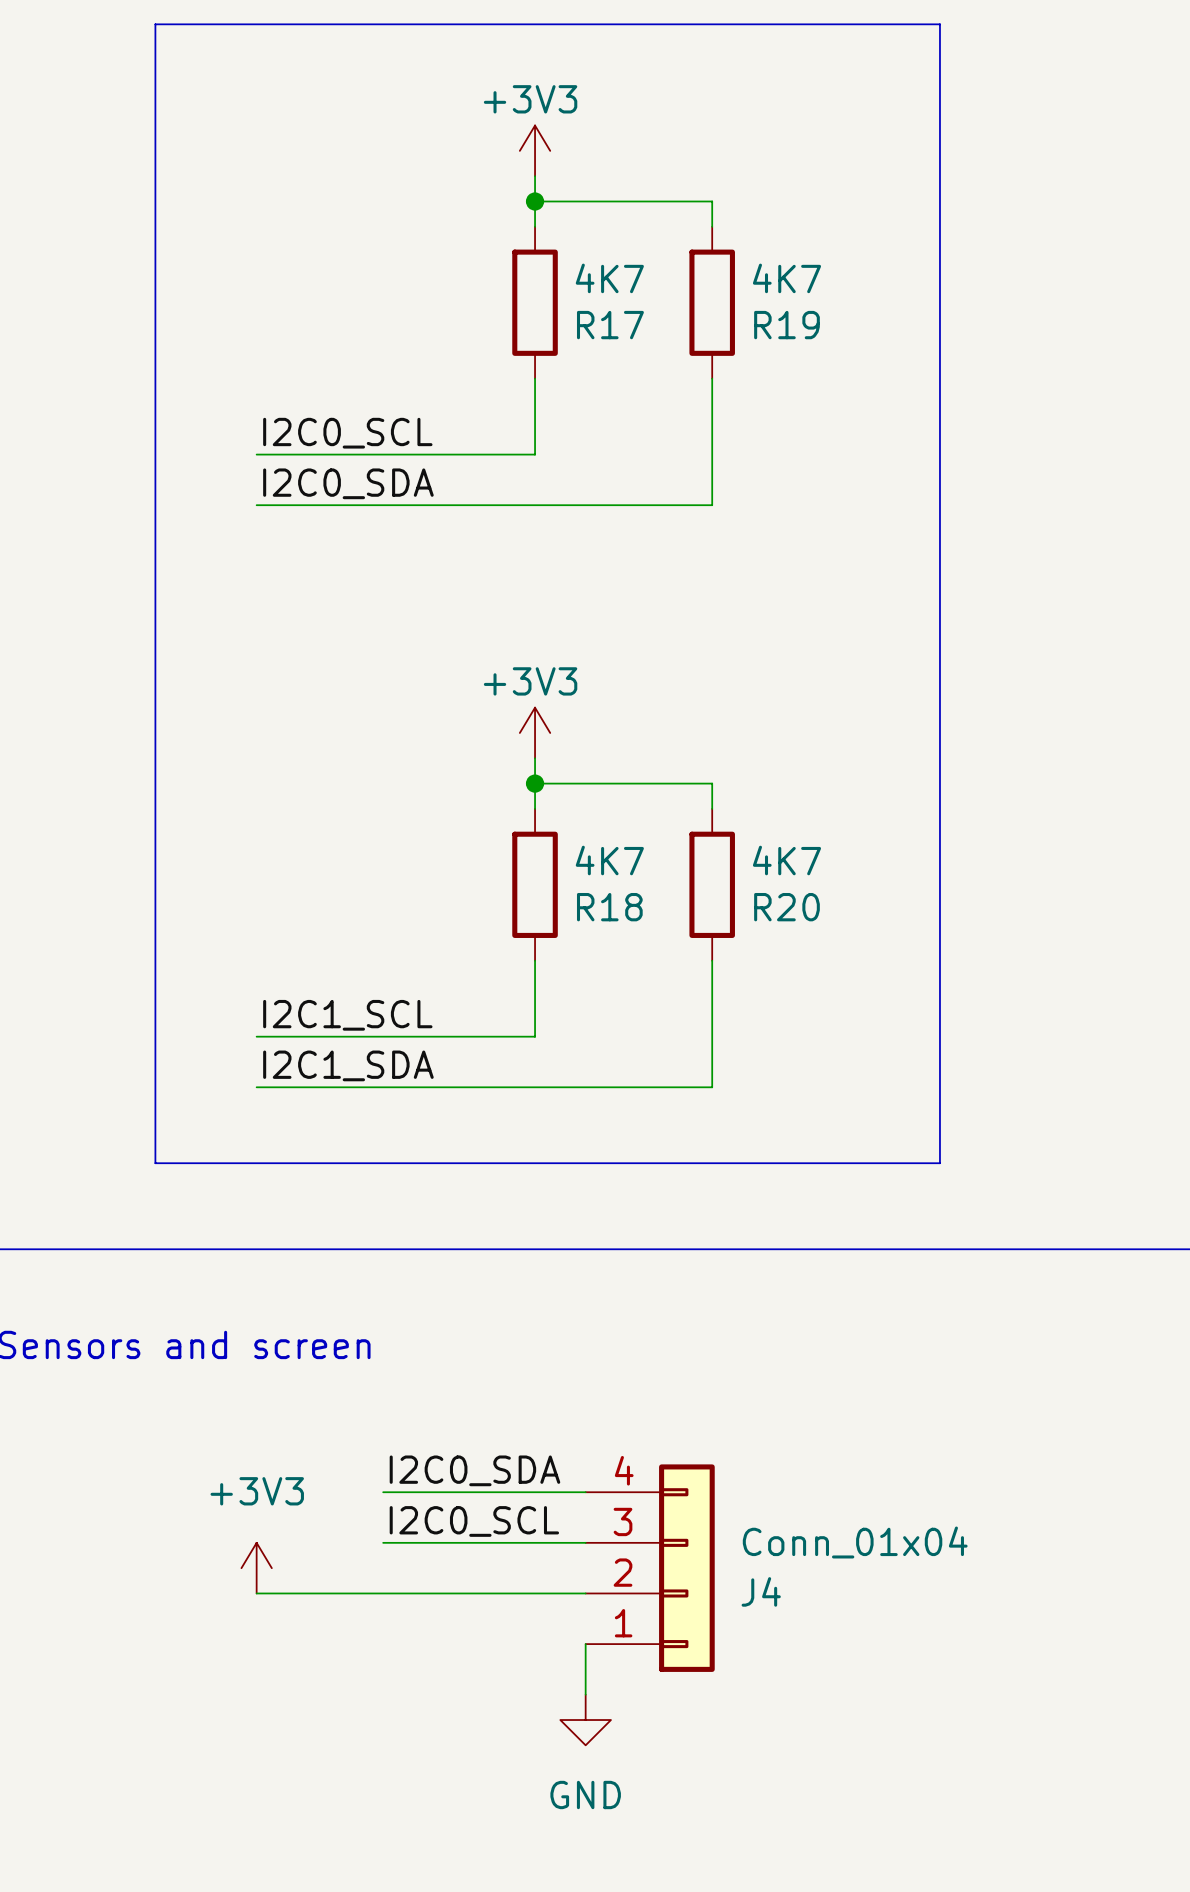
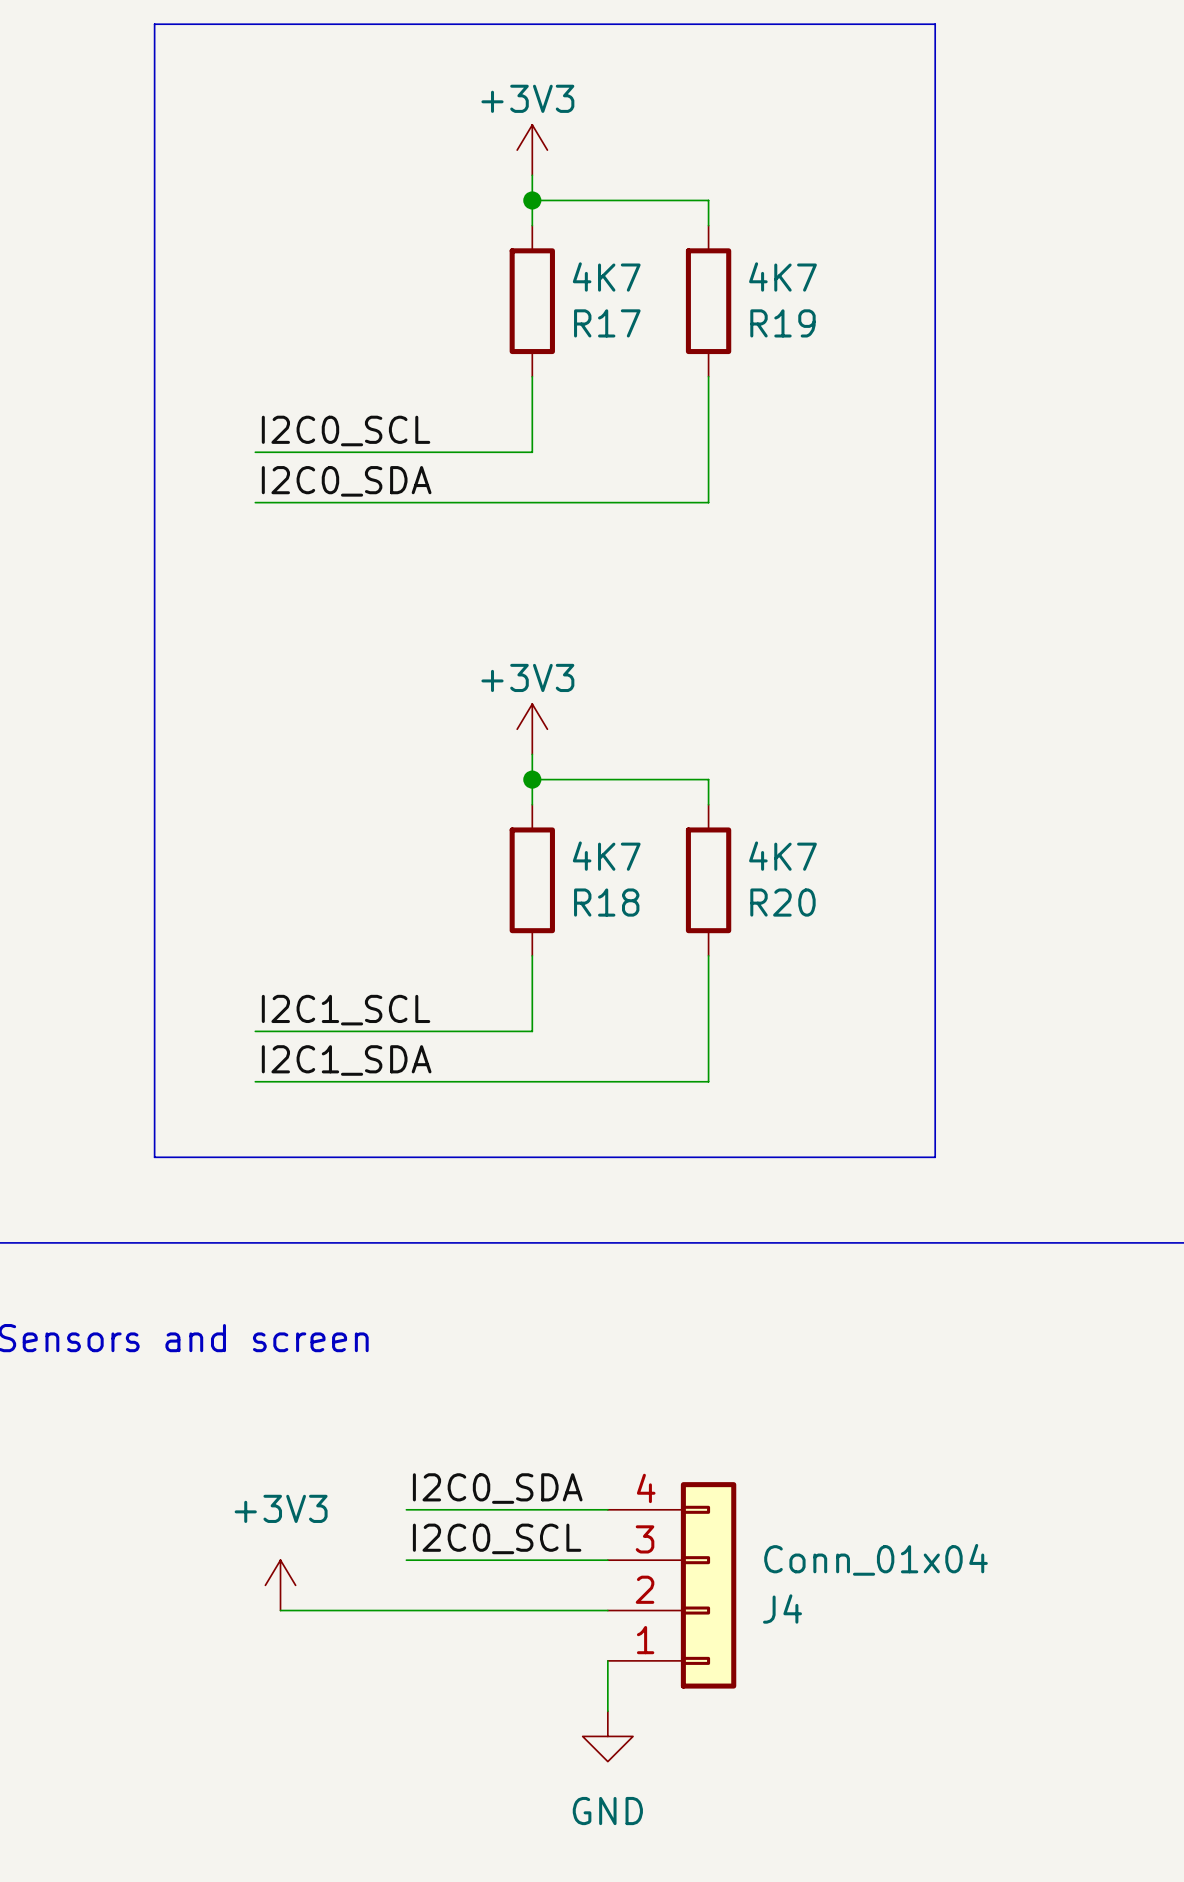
label position: I2C0_SDA (474, 1470) -> I2C0_SDA (497, 1488)
wire: (383, 1492) (585, 1492) -> (406, 1560) (607, 1560)
label position: I2C0_SCL (474, 1521) -> I2C0_SCL (497, 1538)
wire: (383, 1542) (585, 1542) -> (406, 1509) (607, 1509)
power symbol position: +3V3 (256, 1568) -> +3V3 (280, 1585)
J4 position: (650, 1568) -> (672, 1585)
wire: (256, 1593) (585, 1593) -> (280, 1610) (607, 1610)
wire: (585, 1644) (585, 1694) -> (607, 1660) (607, 1711)
power symbol position: GND (585, 1720) -> GND (607, 1736)

